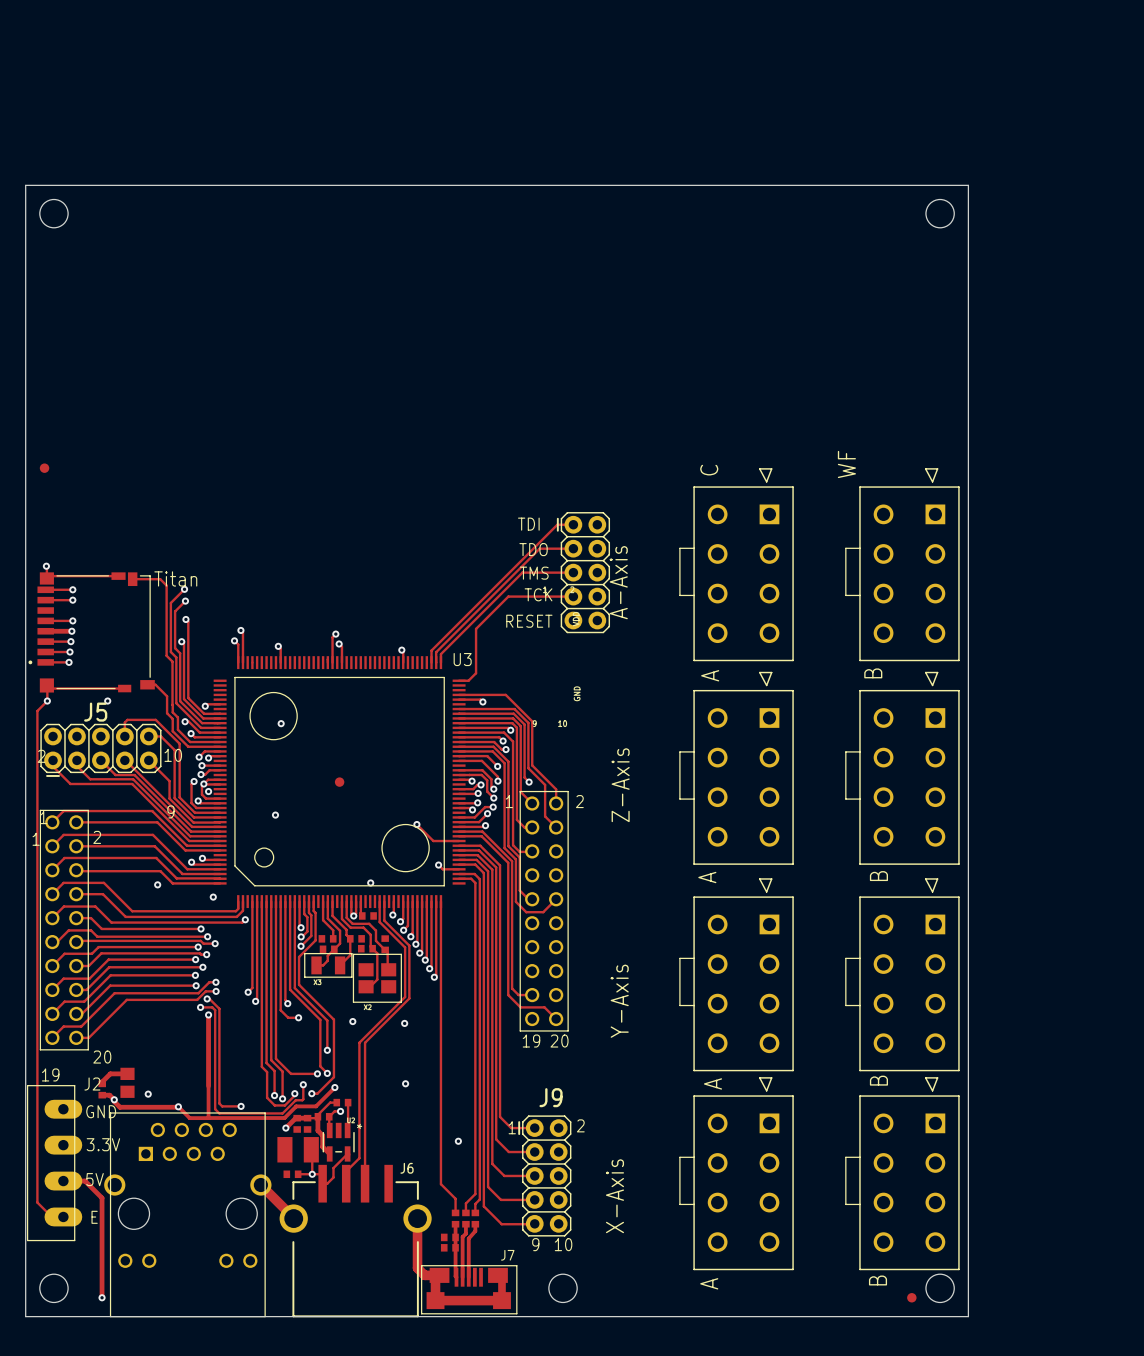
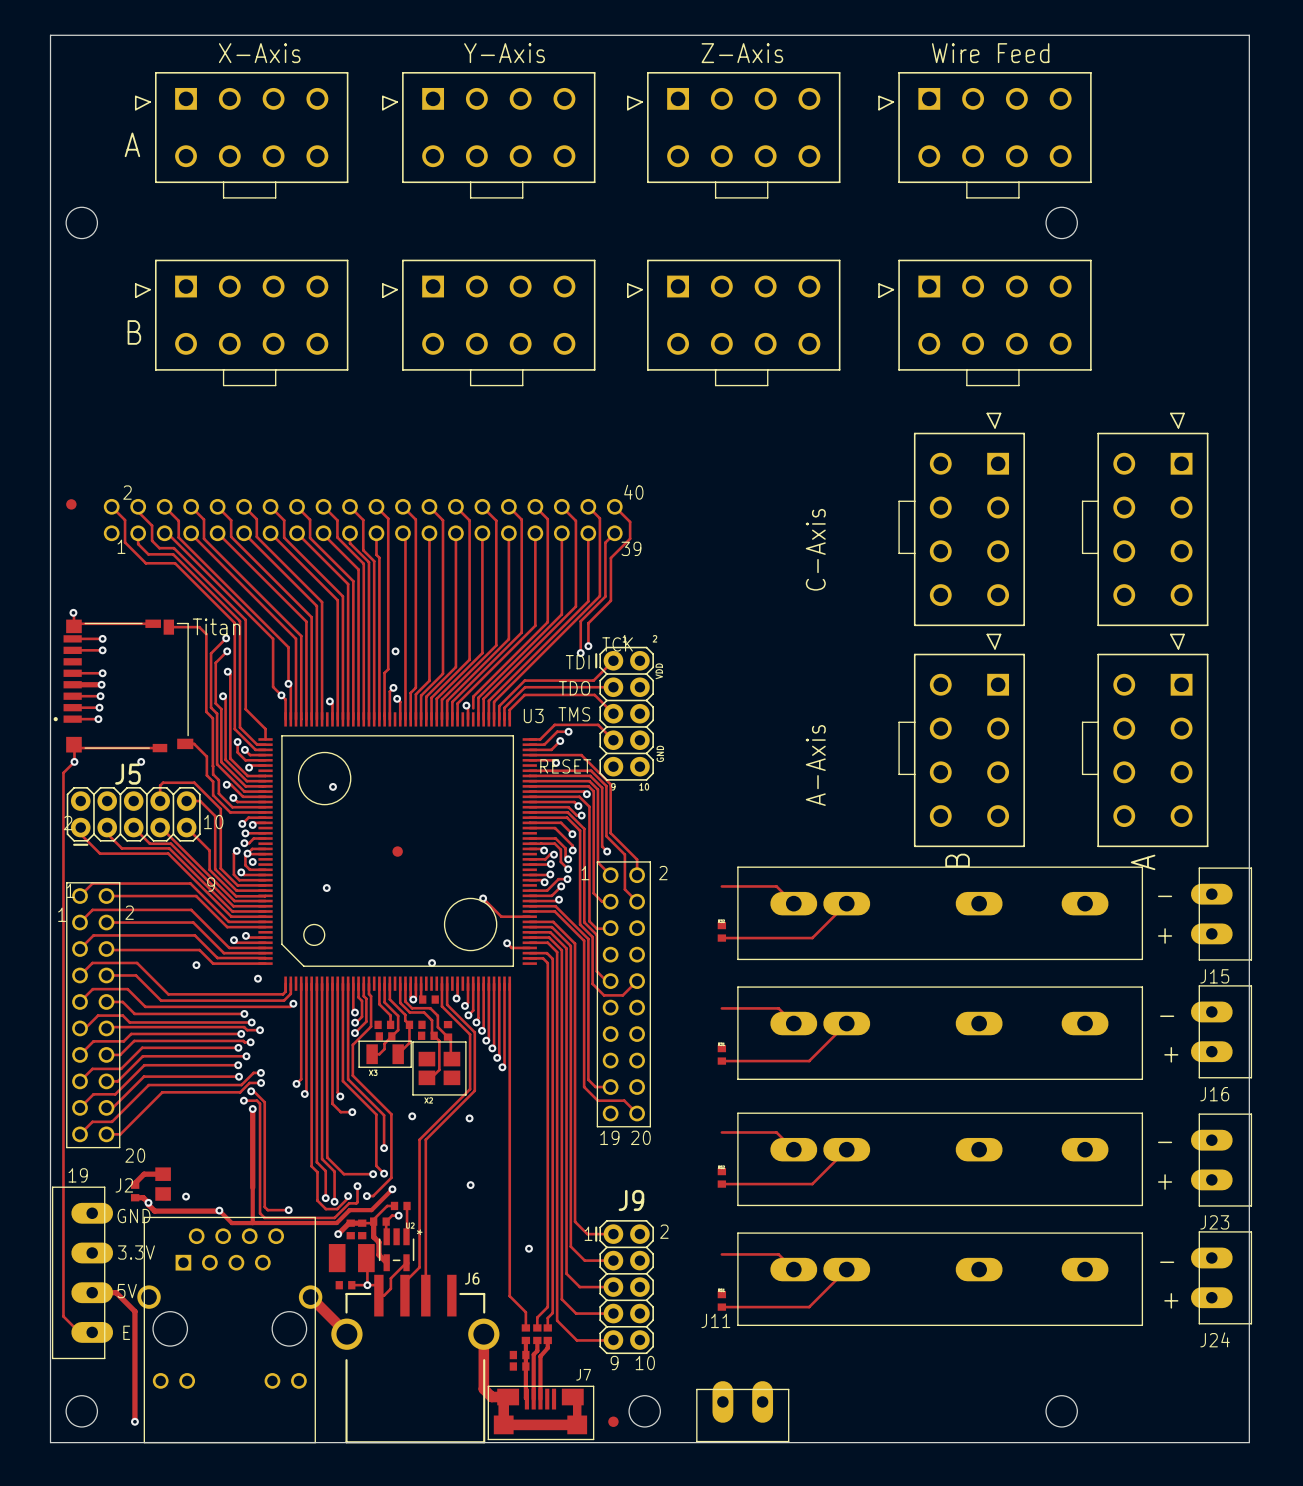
text: none -> X-Axis (259, 53)
text: none -> Y-Axis (504, 53)
text: none -> Z-Axis (742, 53)
text: none -> Wire Feed (990, 53)
part: none -> (241, 135)
part: none -> (488, 135)
part: none -> (733, 135)
part: none -> (984, 135)
text: none -> A (132, 144)
board edge: (25, 185) (968, 185) (968, 1316) -> (50, 191) (50, 35) (1249, 35) (1249, 1442) (1092, 1442)
part: none -> (241, 322)
part: none -> (488, 322)
part: none -> (733, 322)
part: none -> (984, 322)
text: none -> B (134, 332)
text: none -> 2 (127, 492)
text: none -> 40 (633, 492)
text: WF (846, 464) -> none
track: none -> (111, 506) (125, 520) (125, 542) (145, 563) (175, 563) (234, 622) (234, 729) (255, 749) (265, 749)
track: none -> (138, 506) (138, 511) (152, 525) (152, 540) (159, 548) (173, 548) (245, 619) (245, 709) (265, 729) (265, 739)
track: none -> (164, 506) (178, 520) (178, 537) (288, 647) (288, 683)
track: none -> (191, 506) (203, 519) (203, 538) (301, 636) (301, 719)
track: none -> (217, 506) (231, 520) (231, 536) (311, 617) (311, 719)
track: none -> (244, 506) (256, 519) (256, 536) (322, 602) (322, 719)
track: none -> (270, 506) (284, 520) (284, 537) (342, 596) (342, 719)
track: none -> (297, 506) (310, 519) (310, 537) (353, 581) (353, 719)
track: none -> (323, 506) (337, 520) (337, 537) (363, 563) (363, 719)
track: none -> (350, 506) (363, 520) (363, 550) (374, 561) (374, 719)
track: none -> (376, 506) (388, 518) (388, 669) (384, 673) (384, 715)
track: none -> (402, 506) (415, 519) (415, 687) (410, 692) (410, 719)
track: none -> (429, 506) (443, 520) (443, 673) (421, 695) (421, 719)
track: none -> (455, 506) (469, 520) (469, 659) (431, 697) (431, 719)
track: none -> (482, 506) (496, 520) (496, 645) (441, 699) (441, 719)
track: none -> (508, 506) (521, 519) (521, 632) (452, 701) (452, 719)
track: none -> (535, 506) (547, 519) (547, 622) (473, 696) (473, 708)
track: none -> (561, 506) (575, 520) (575, 606) (483, 698) (483, 719)
track: none -> (588, 506) (599, 518) (599, 596) (494, 701) (494, 719)
track: none -> (614, 506) (630, 521) (630, 538) (610, 558) (610, 600) (588, 623) (588, 646)
text: C (709, 470) -> none
part: none -> (961, 519)
part: none -> (1145, 519)
part: none -> (363, 520)
track: none -> (138, 533) (138, 544) (148, 554) (173, 554) (239, 621) (239, 727) (257, 744) (265, 744)
track: none -> (164, 533) (167, 533) (273, 638) (273, 687) (281, 695)
track: none -> (191, 533) (296, 638) (296, 719)
track: none -> (217, 533) (306, 621) (306, 719)
track: none -> (244, 533) (316, 606) (316, 719)
track: none -> (270, 533) (337, 600) (337, 719)
track: none -> (297, 533) (348, 584) (348, 719)
track: none -> (323, 533) (358, 569) (358, 719)
track: none -> (350, 533) (350, 543) (368, 562) (368, 719)
track: none -> (376, 533) (376, 554) (379, 557) (379, 719)
track: none -> (402, 533) (405, 535) (405, 719)
track: none -> (429, 533) (429, 680) (415, 694) (415, 719)
track: none -> (455, 533) (455, 667) (426, 696) (426, 719)
track: none -> (482, 533) (482, 653) (436, 698) (436, 719)
track: none -> (508, 533) (508, 639) (447, 700) (447, 719)
track: none -> (535, 533) (535, 625) (457, 703) (457, 719)
track: none -> (561, 533) (561, 614) (478, 697) (478, 719)
track: none -> (588, 533) (588, 601) (488, 700) (488, 719)
track: none -> (614, 533) (605, 542) (605, 596) (580, 621) (580, 653)
text: none -> 1 (121, 546)
text: none -> 39 (631, 548)
text: none -> C-Axis (815, 549)
text position: TDI (528, 524) -> TDI (577, 662)
track: (573, 524) (557, 524) (454, 627) -> (613, 660) (593, 680) (524, 680)
track: (573, 548) (539, 548) (454, 633) -> (613, 687) (525, 687)
text position: TDO (533, 549) -> TDO (574, 688)
part: (736, 564) -> none
part: (902, 564) -> none
track: (573, 572) (522, 572) (454, 640) -> (613, 713) (594, 694) (524, 694)
part position: (583, 572) -> (624, 713)
text position: TMS (534, 573) -> TMS (574, 714)
text position: A-Axis (618, 582) -> A-Axis (815, 765)
via: none -> (588, 646)
track: (573, 596) (508, 596) (476, 628) (476, 673) -> (613, 740) (598, 724) (554, 724) (548, 731)
via: none -> (395, 651)
via: none -> (580, 653)
text position: RESET (529, 621) -> RESET (565, 766)
track: none -> (568, 731) (557, 731) (544, 744) (529, 744)
via: none -> (568, 731)
text: B (873, 673) -> none
text: A (710, 675) -> none
part: none -> (961, 740)
part: none -> (1145, 740)
track: none -> (560, 741) (551, 749) (529, 749)
via: none -> (560, 741)
track: none -> (237, 742) (237, 752) (245, 760) (265, 760)
via: none -> (237, 742)
track: none -> (244, 749) (250, 755) (265, 755)
via: none -> (244, 749)
part: (736, 768) -> none
part: (902, 768) -> none
text: Z-Axis (620, 785) -> none
text: none -> B (957, 860)
text: none -> A (1143, 862)
track: none -> (721, 886) (776, 886) (793, 903)
text: none -> - (1165, 896)
track: none -> (846, 903) (812, 938) (721, 938)
part: none -> (940, 913)
J15: none -> (1221, 914)
part: none -> (721, 931)
text: none -> + (1165, 935)
text: B (878, 876) -> none
text: A (707, 877) -> none
track: none -> (721, 1008) (778, 1008) (793, 1023)
text: none -> - (1167, 1016)
track: none -> (846, 1023) (809, 1061) (721, 1061)
J16: none -> (1221, 1031)
part: none -> (940, 1033)
part: none -> (721, 1054)
text: none -> + (1171, 1054)
part: (736, 974) -> none
part: (902, 974) -> none
text: Y-Axis (619, 1001) -> none
track: none -> (721, 1132) (776, 1132) (793, 1149)
text: none -> - (1165, 1142)
track: none -> (846, 1149) (812, 1184) (721, 1184)
part: none -> (940, 1159)
J23: none -> (1221, 1160)
part: none -> (721, 1177)
text: B (878, 1080) -> none
text: none -> + (1165, 1182)
text: A (713, 1083) -> none
track: none -> (721, 1254) (778, 1254) (793, 1269)
text: none -> - (1167, 1262)
track: none -> (846, 1269) (809, 1307) (721, 1307)
J24: none -> (1221, 1277)
part: none -> (940, 1279)
part: (736, 1173) -> none
part: (902, 1173) -> none
part: none -> (721, 1300)
text: none -> + (1171, 1300)
text: X-Axis (614, 1196) -> none
text: B (878, 1280) -> none
text: A (709, 1283) -> none
J11: none -> (742, 1411)
part: none -> (613, 1421)
part: (911, 1297) -> none

